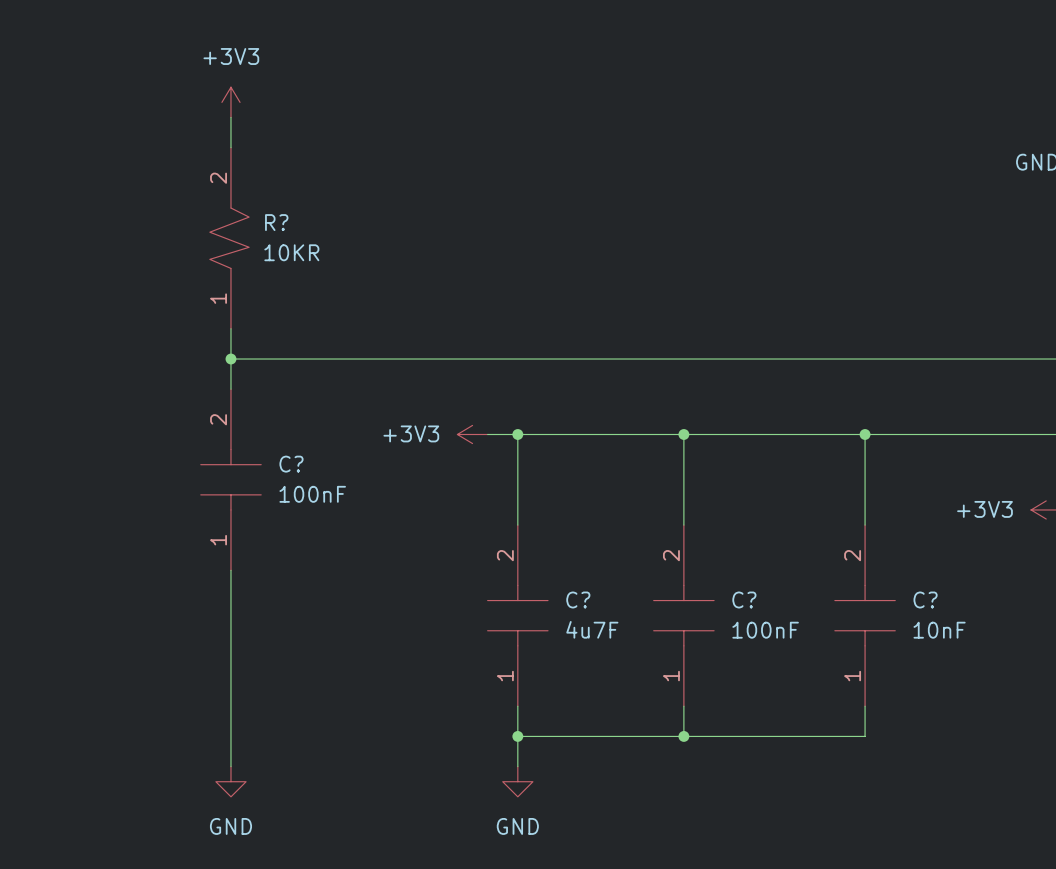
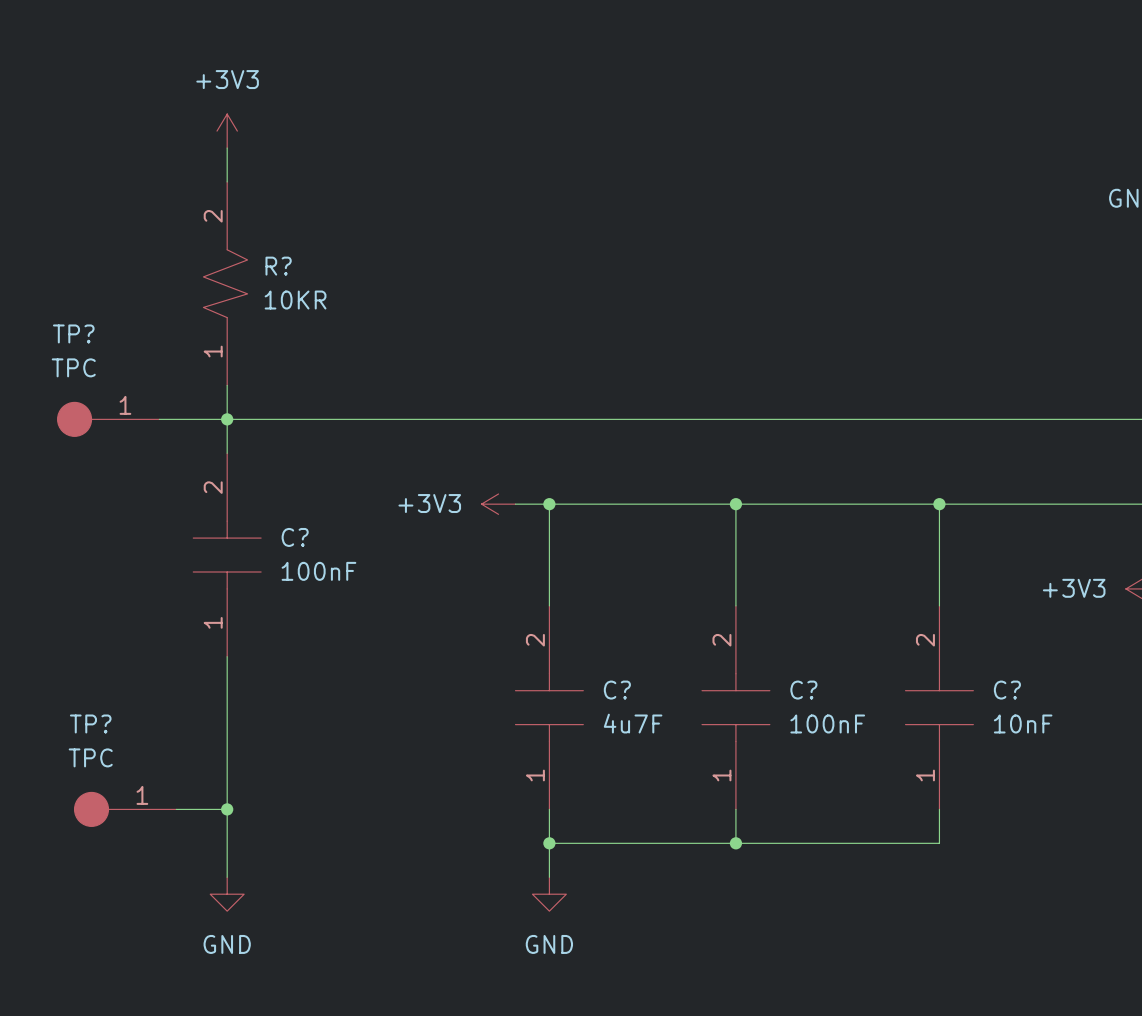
TP?: none -> TPC (108, 419)
wire: none -> (159, 419) (227, 419)
TP?: none -> TPC (125, 809)
wire: none -> (176, 809) (227, 809)
junction: none -> (227, 809)

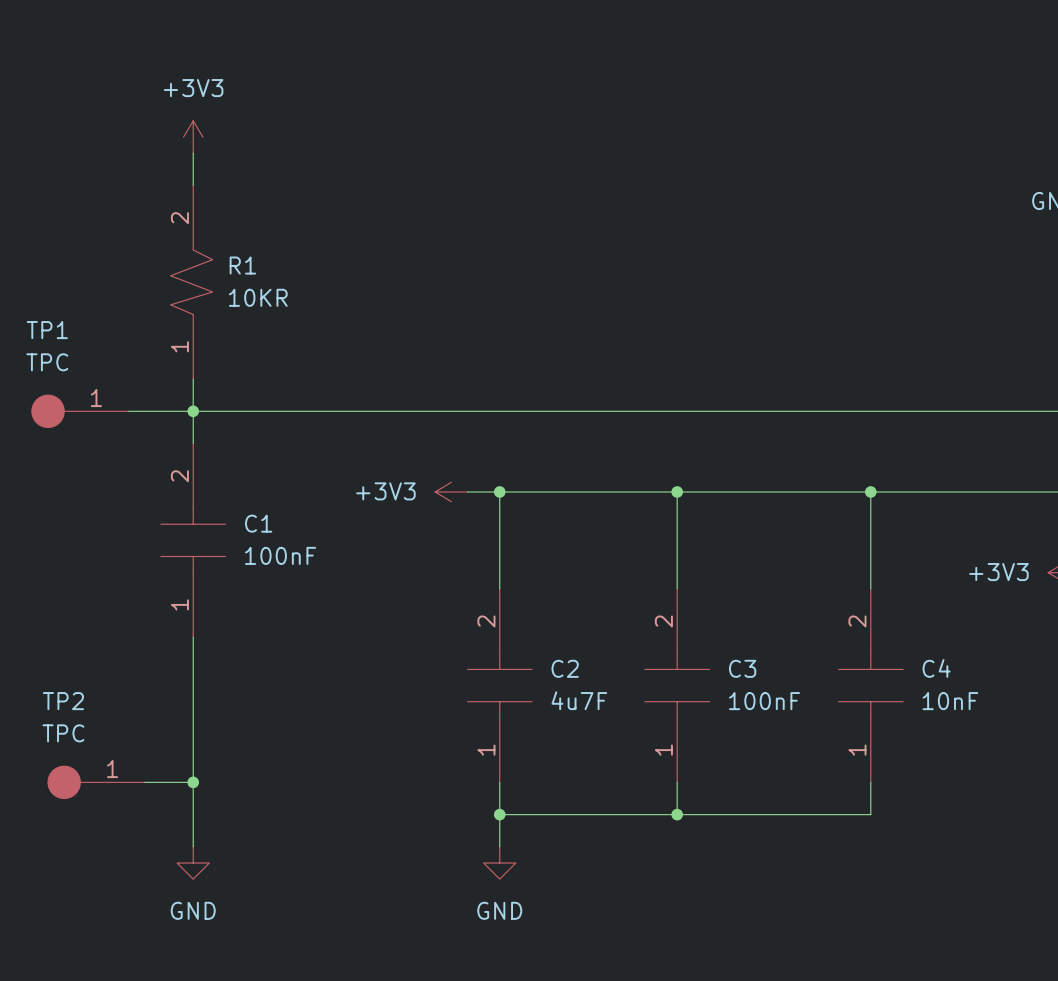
R? name: R? (278, 266) -> R1 (242, 265)
TP? name: TP? (73, 333) -> TP1 (47, 330)
C? name: C? (295, 537) -> C1 (258, 523)
C? name: C? (617, 690) -> C2 (565, 668)
C? name: C? (803, 690) -> C3 (742, 668)
C? name: C? (1007, 690) -> C4 (936, 668)
TP? name: TP? (90, 723) -> TP2 (63, 701)

